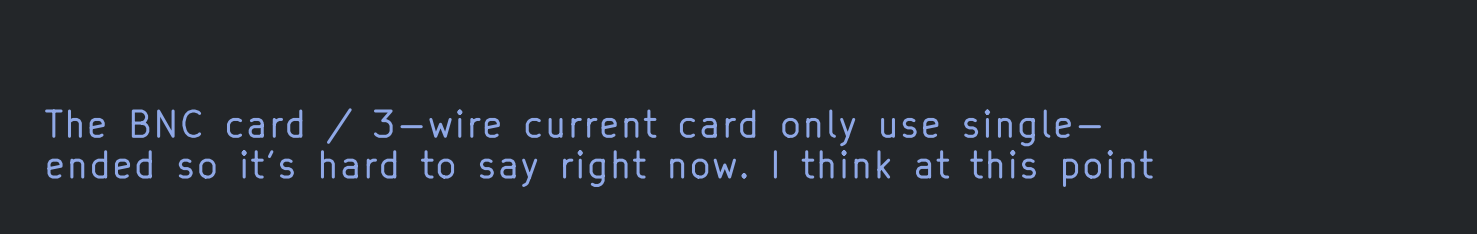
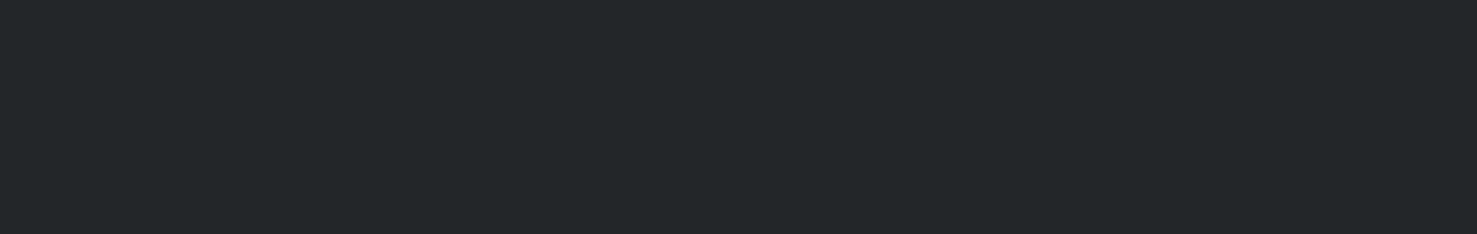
text: The BNC card / 3-wire current card only use single- (573, 127) -> none
text: ended so it's hard to say right now. I think at this point (600, 168) -> none

